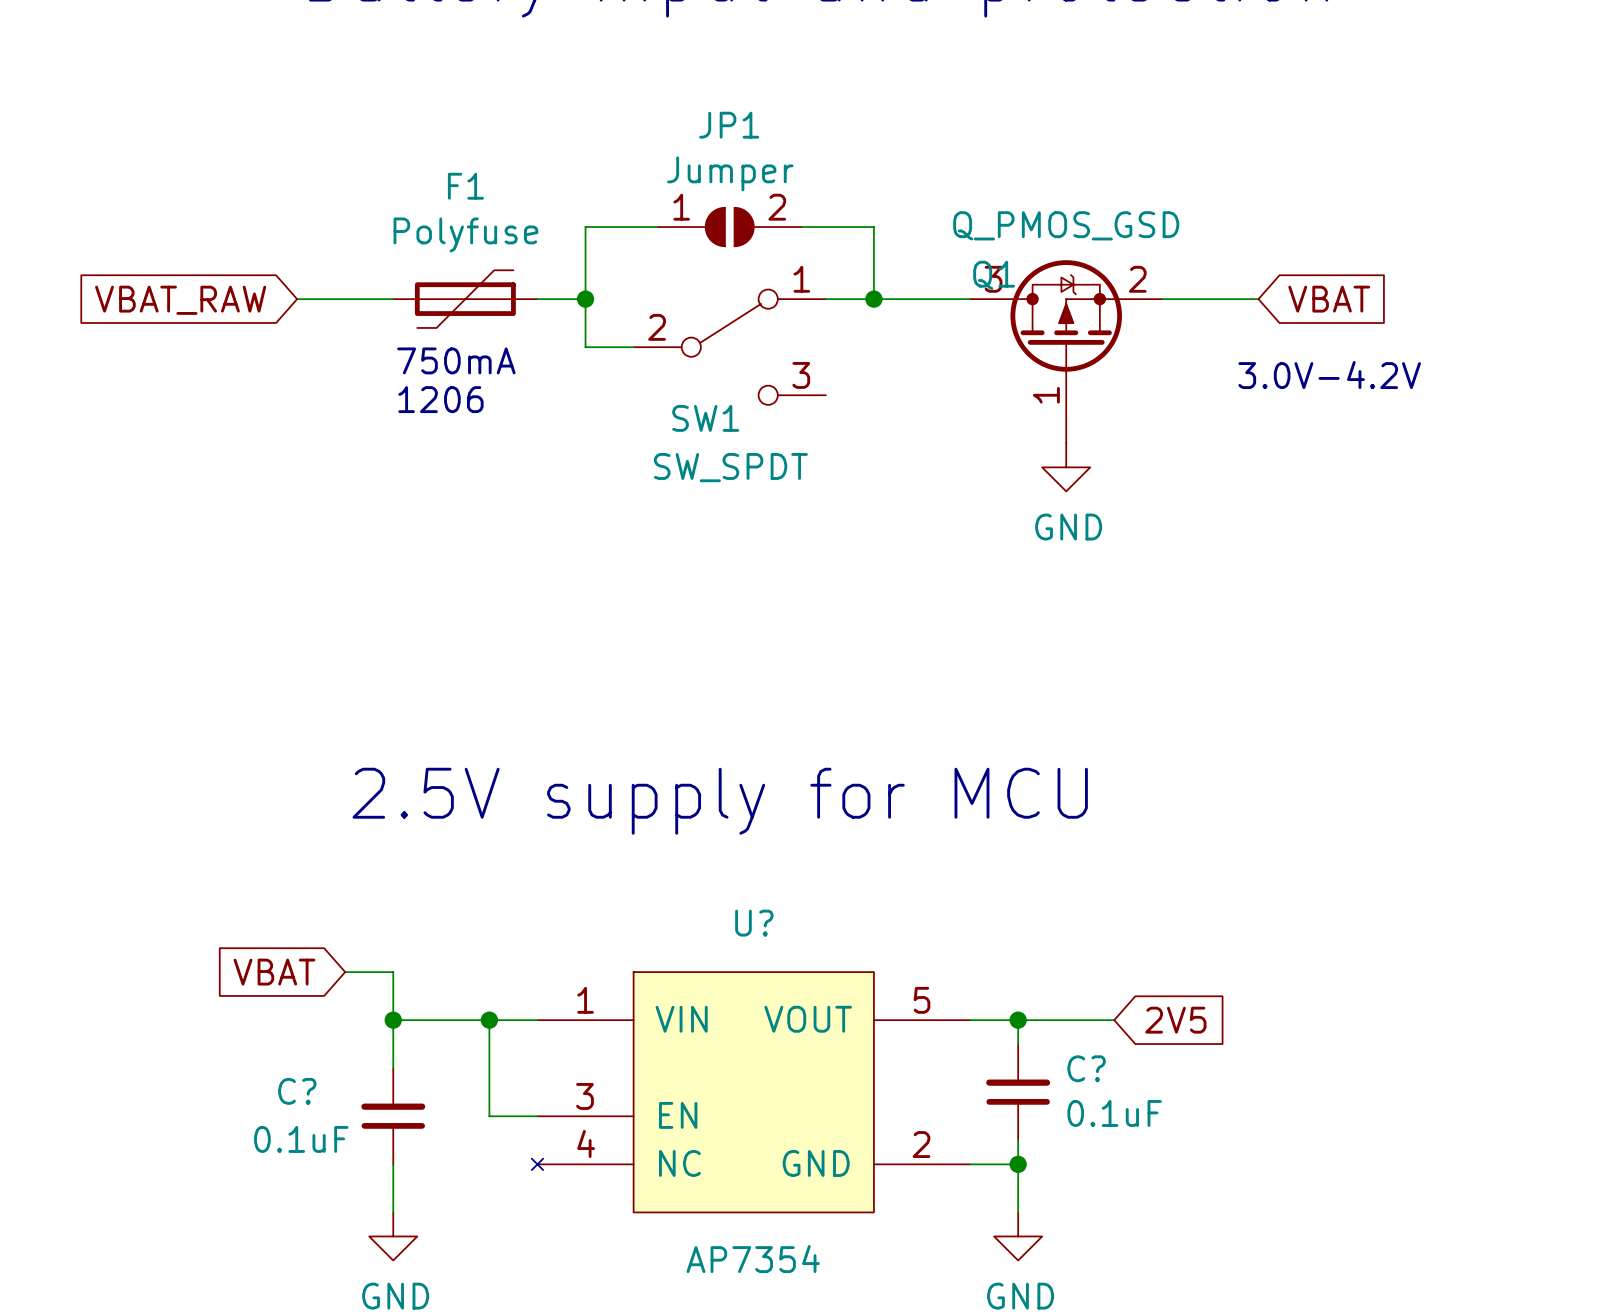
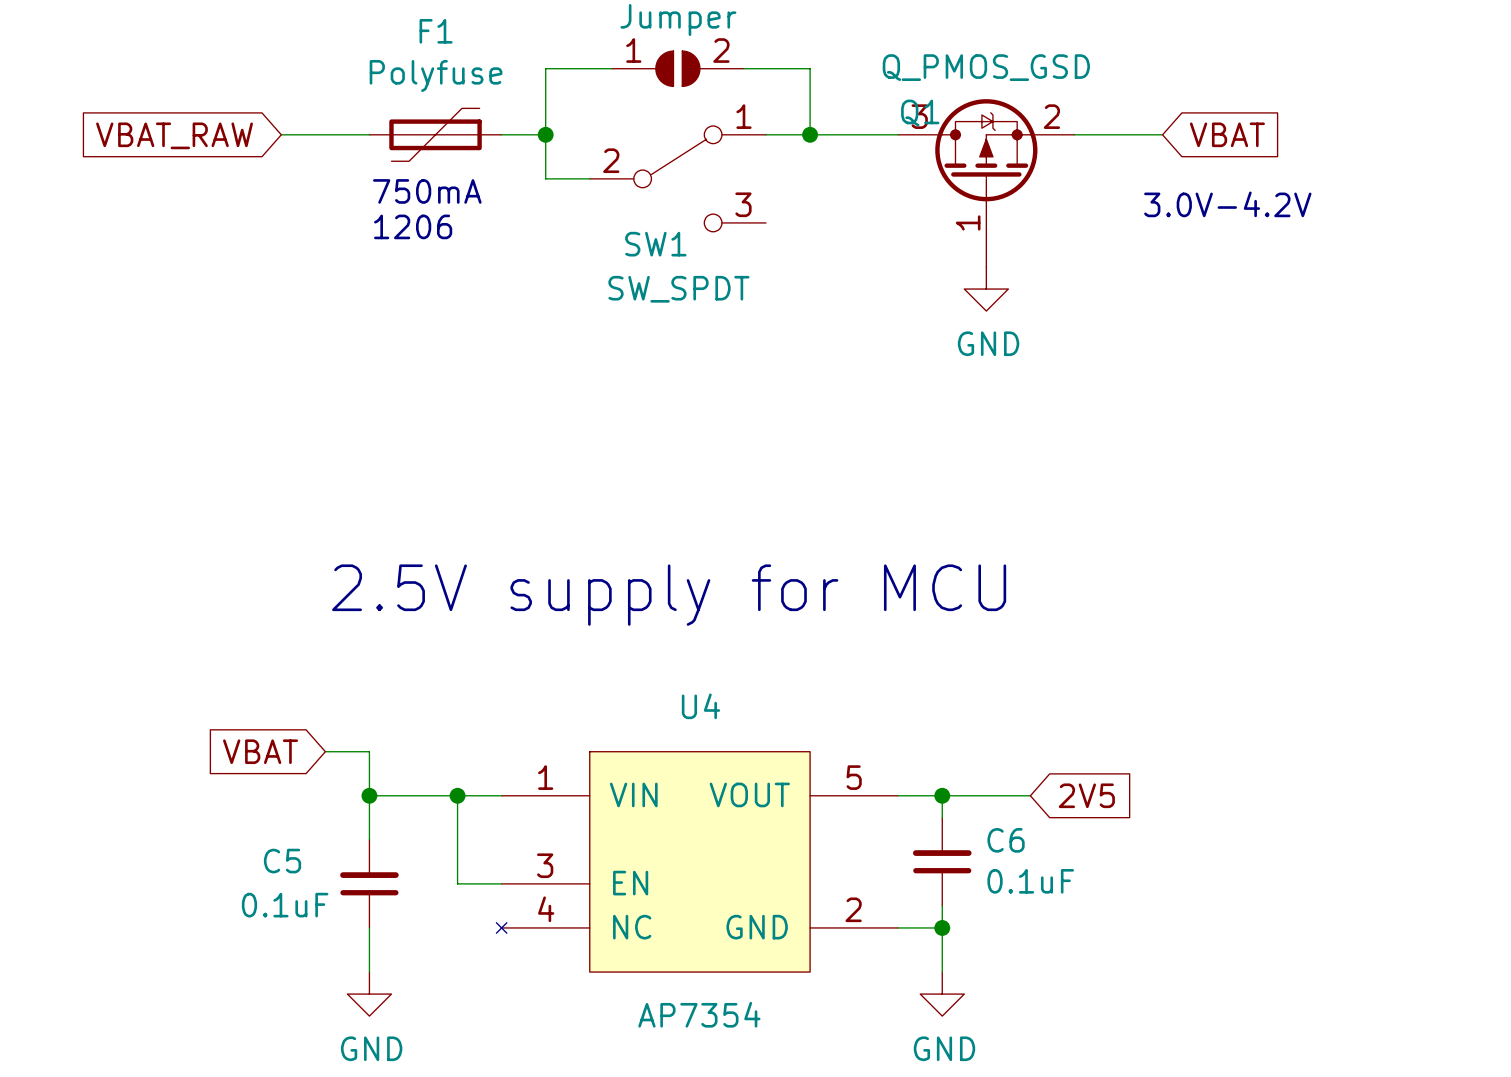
U? name: U? (754, 923) -> U4 (700, 706)
C? name: C? (1086, 1068) -> C6 (1006, 840)
C? name: C? (297, 1091) -> C5 (282, 861)

